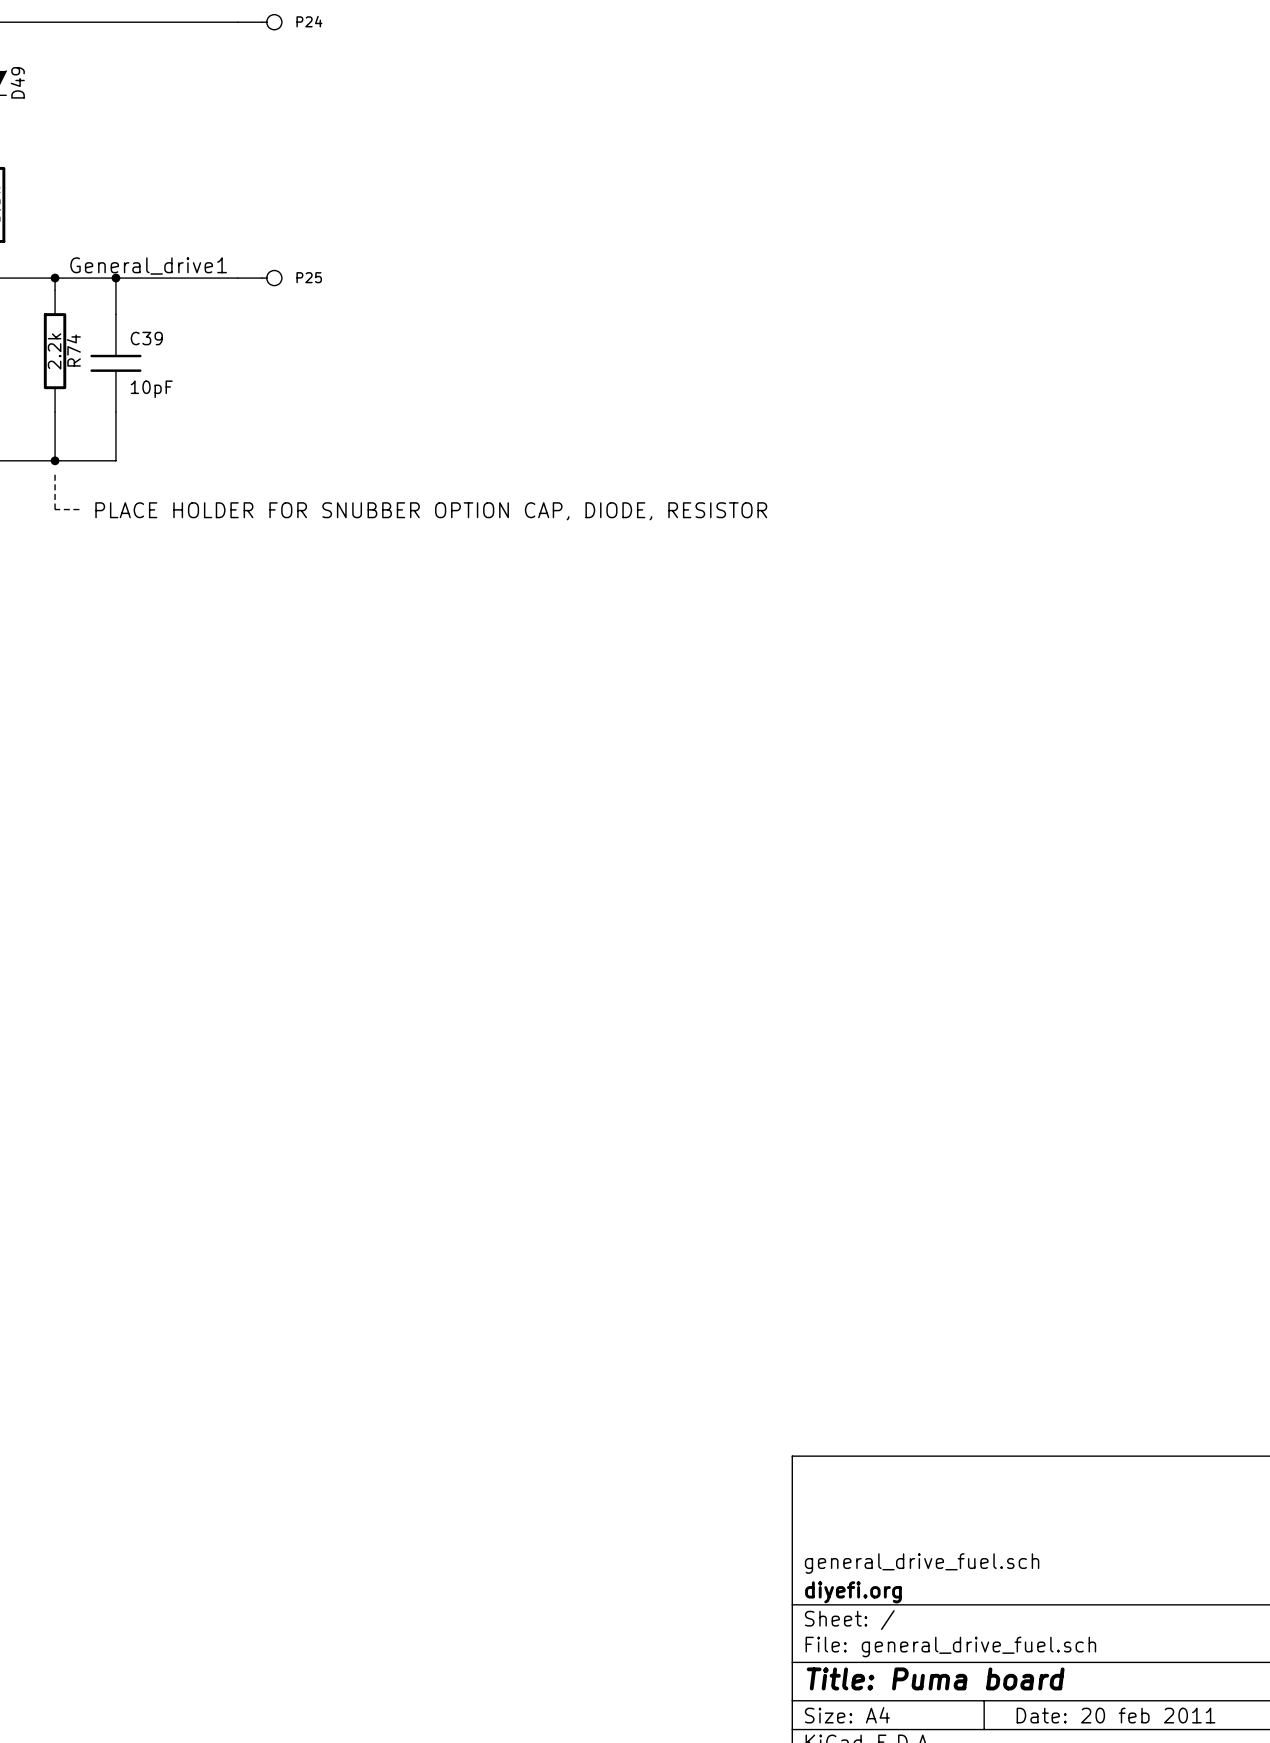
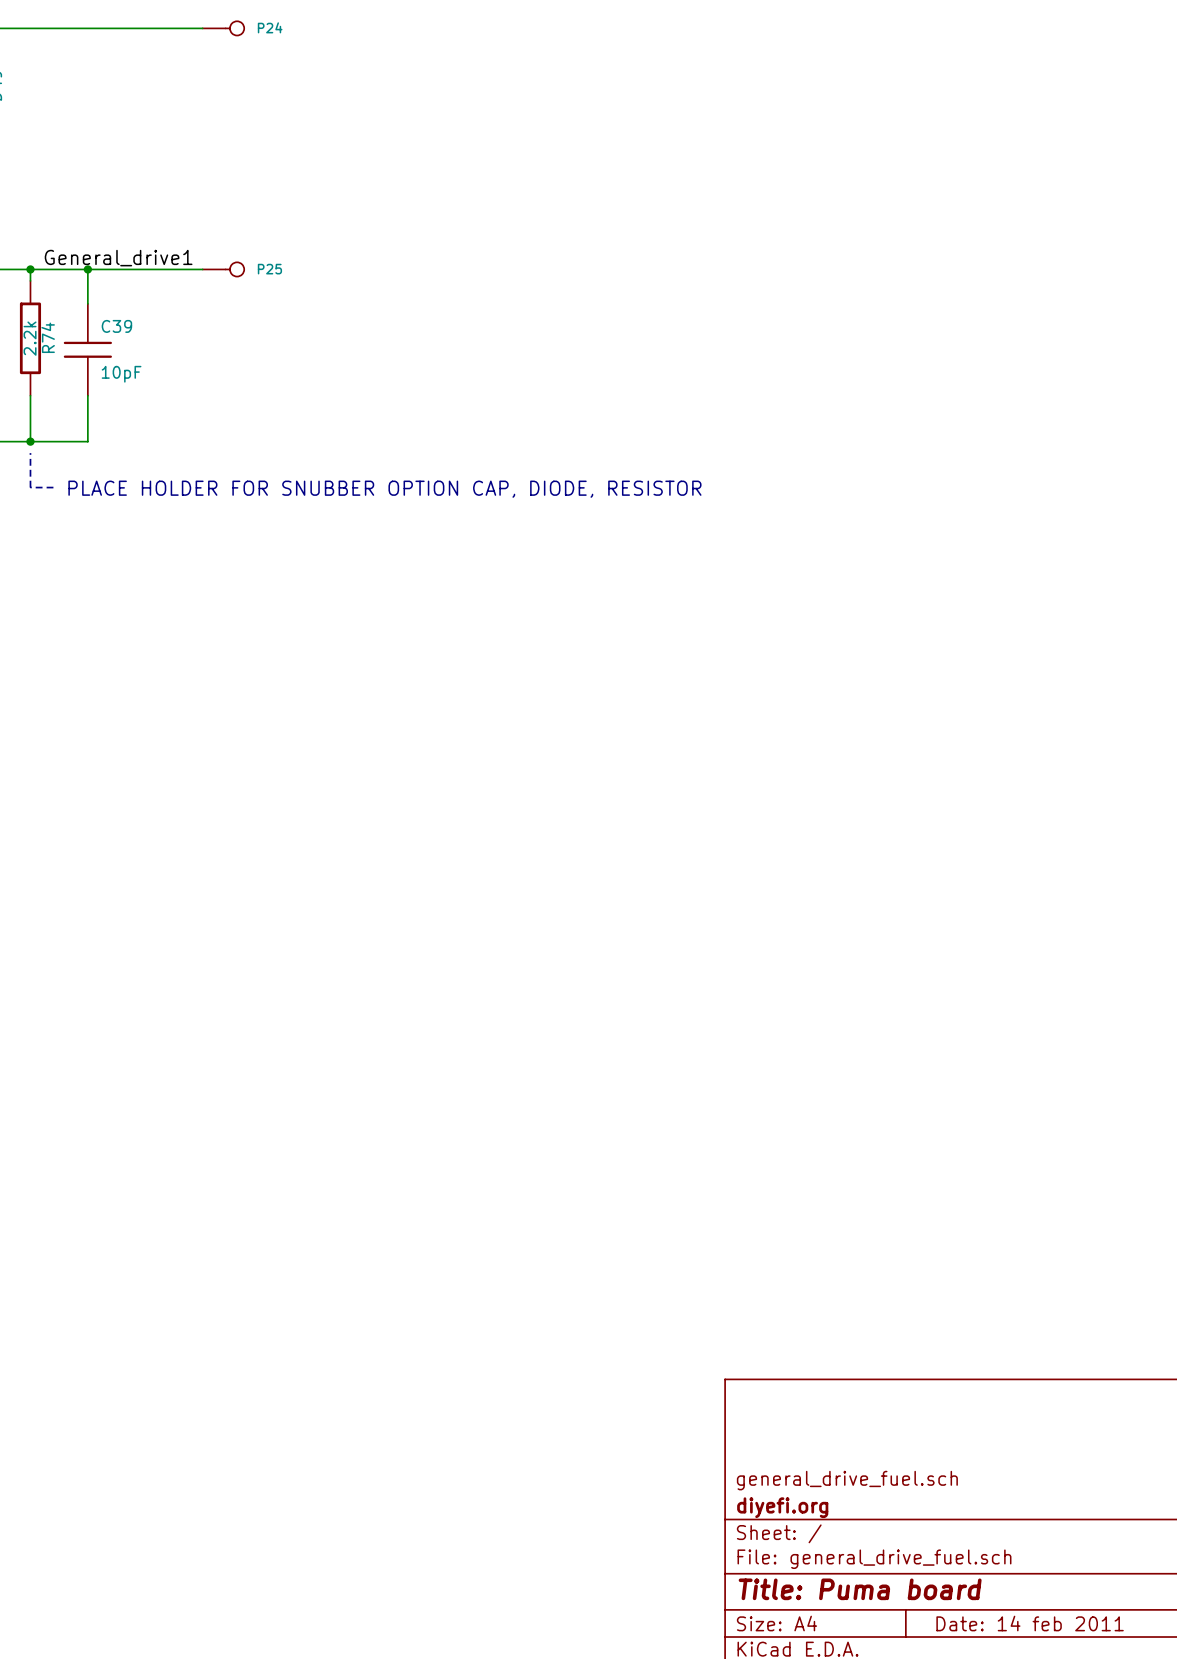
title block: Date: 20 feb 2011 (1116, 1715) -> Date: 14 feb 2011 (1030, 1623)

